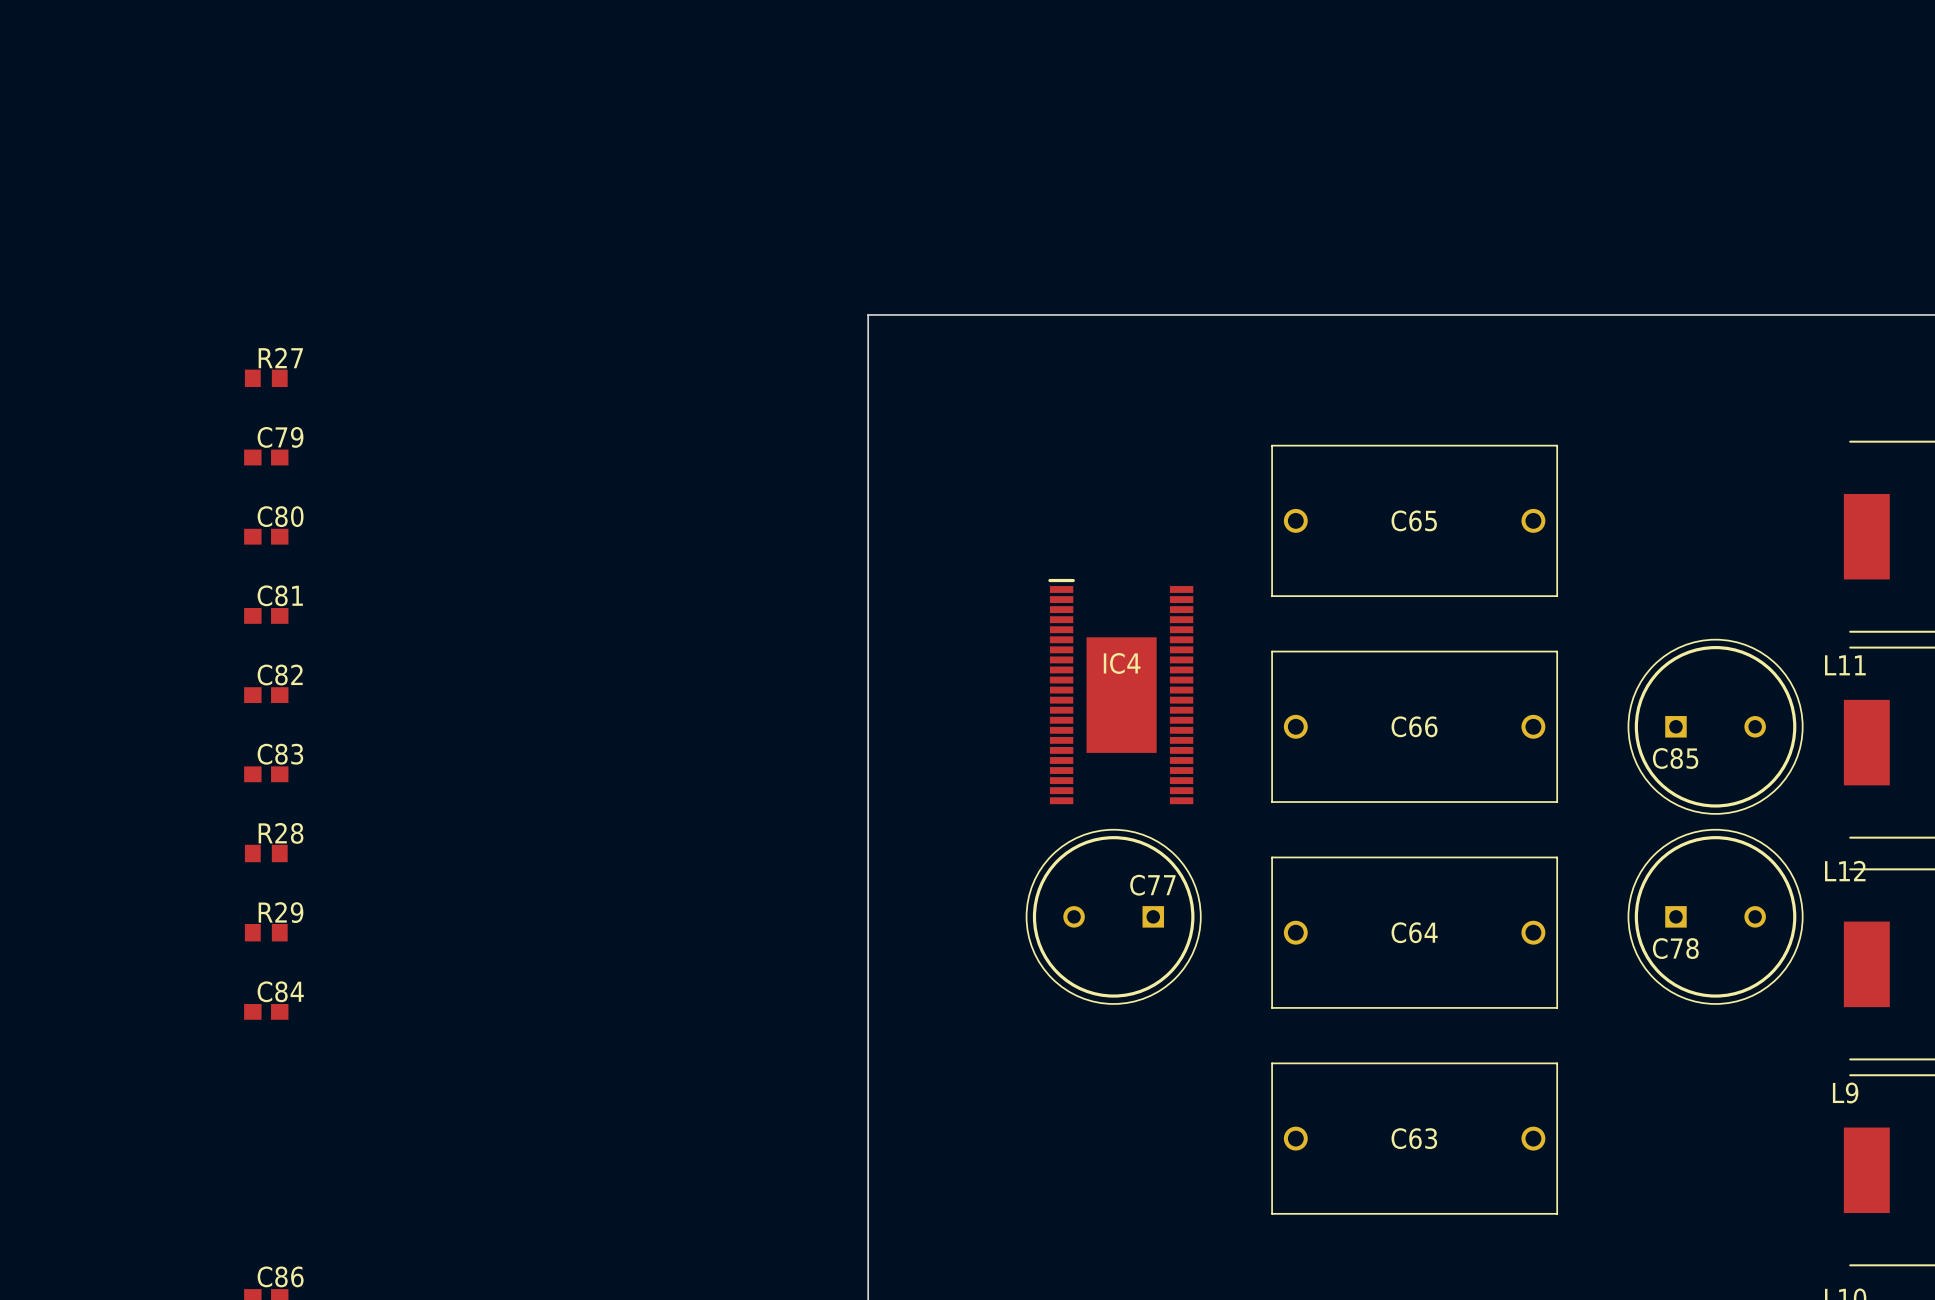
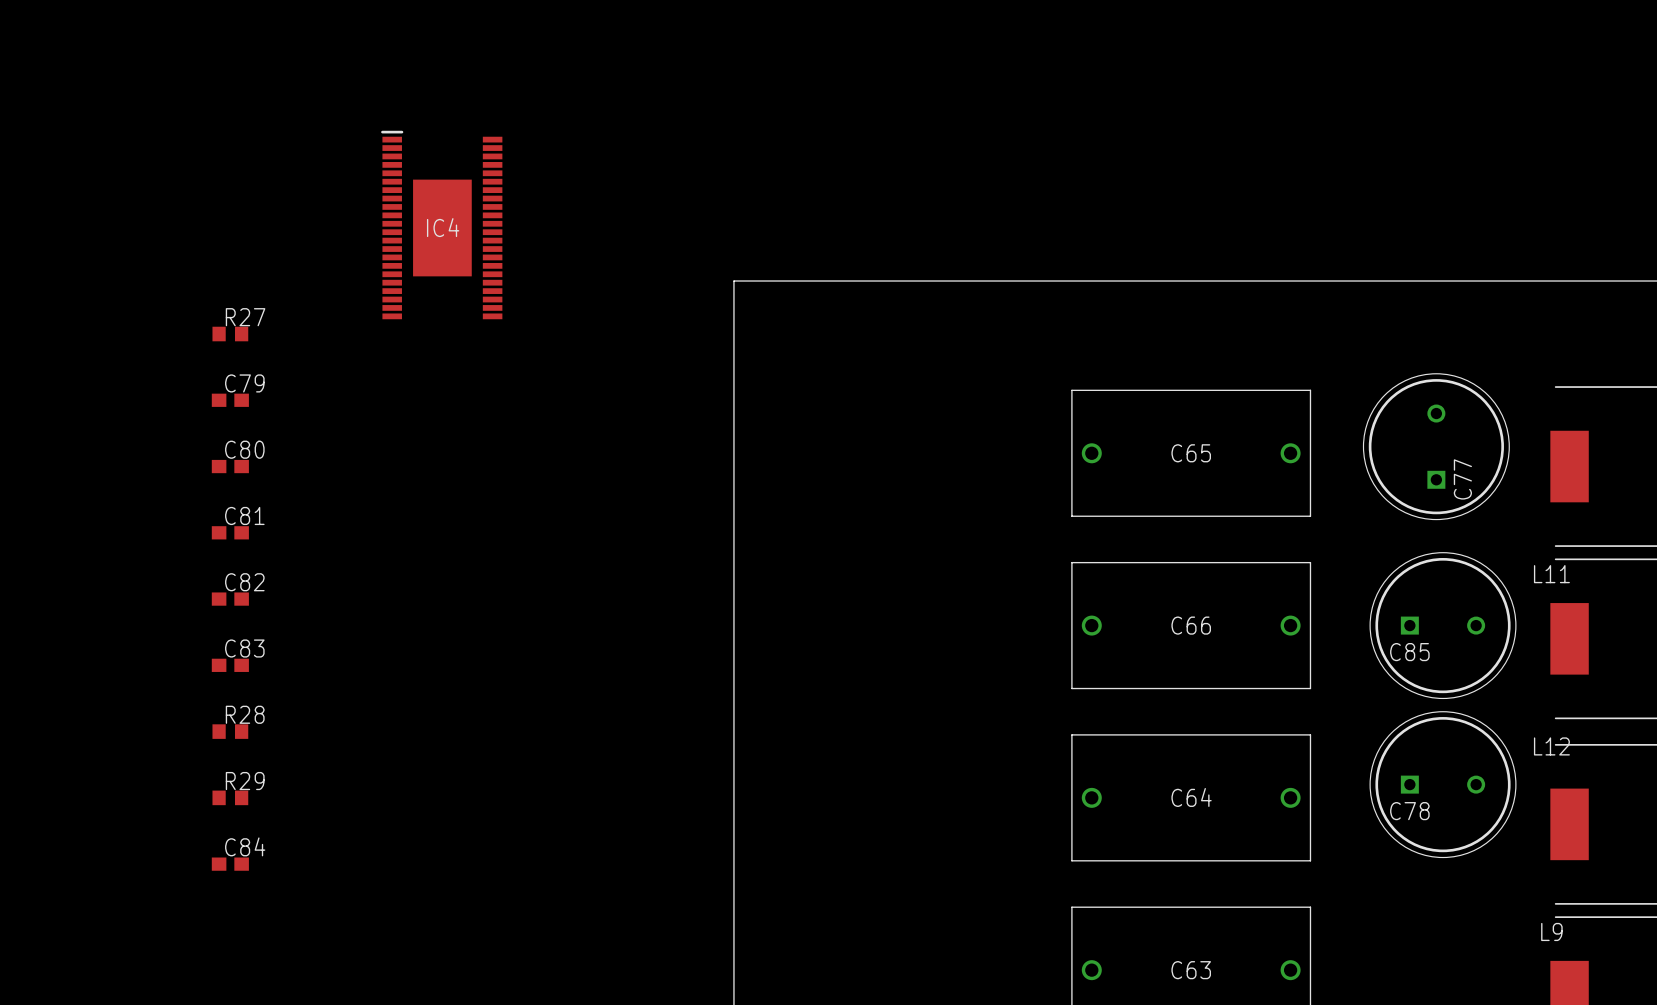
IC4 name position: IC4 (1122, 663) -> IC4 (443, 227)
IC4 position: (1120, 691) -> (441, 225)
C77 rotation: 0° (1113, 916) -> 90° clockwise (1436, 446)
C77 position: (1113, 916) -> (1436, 446)

